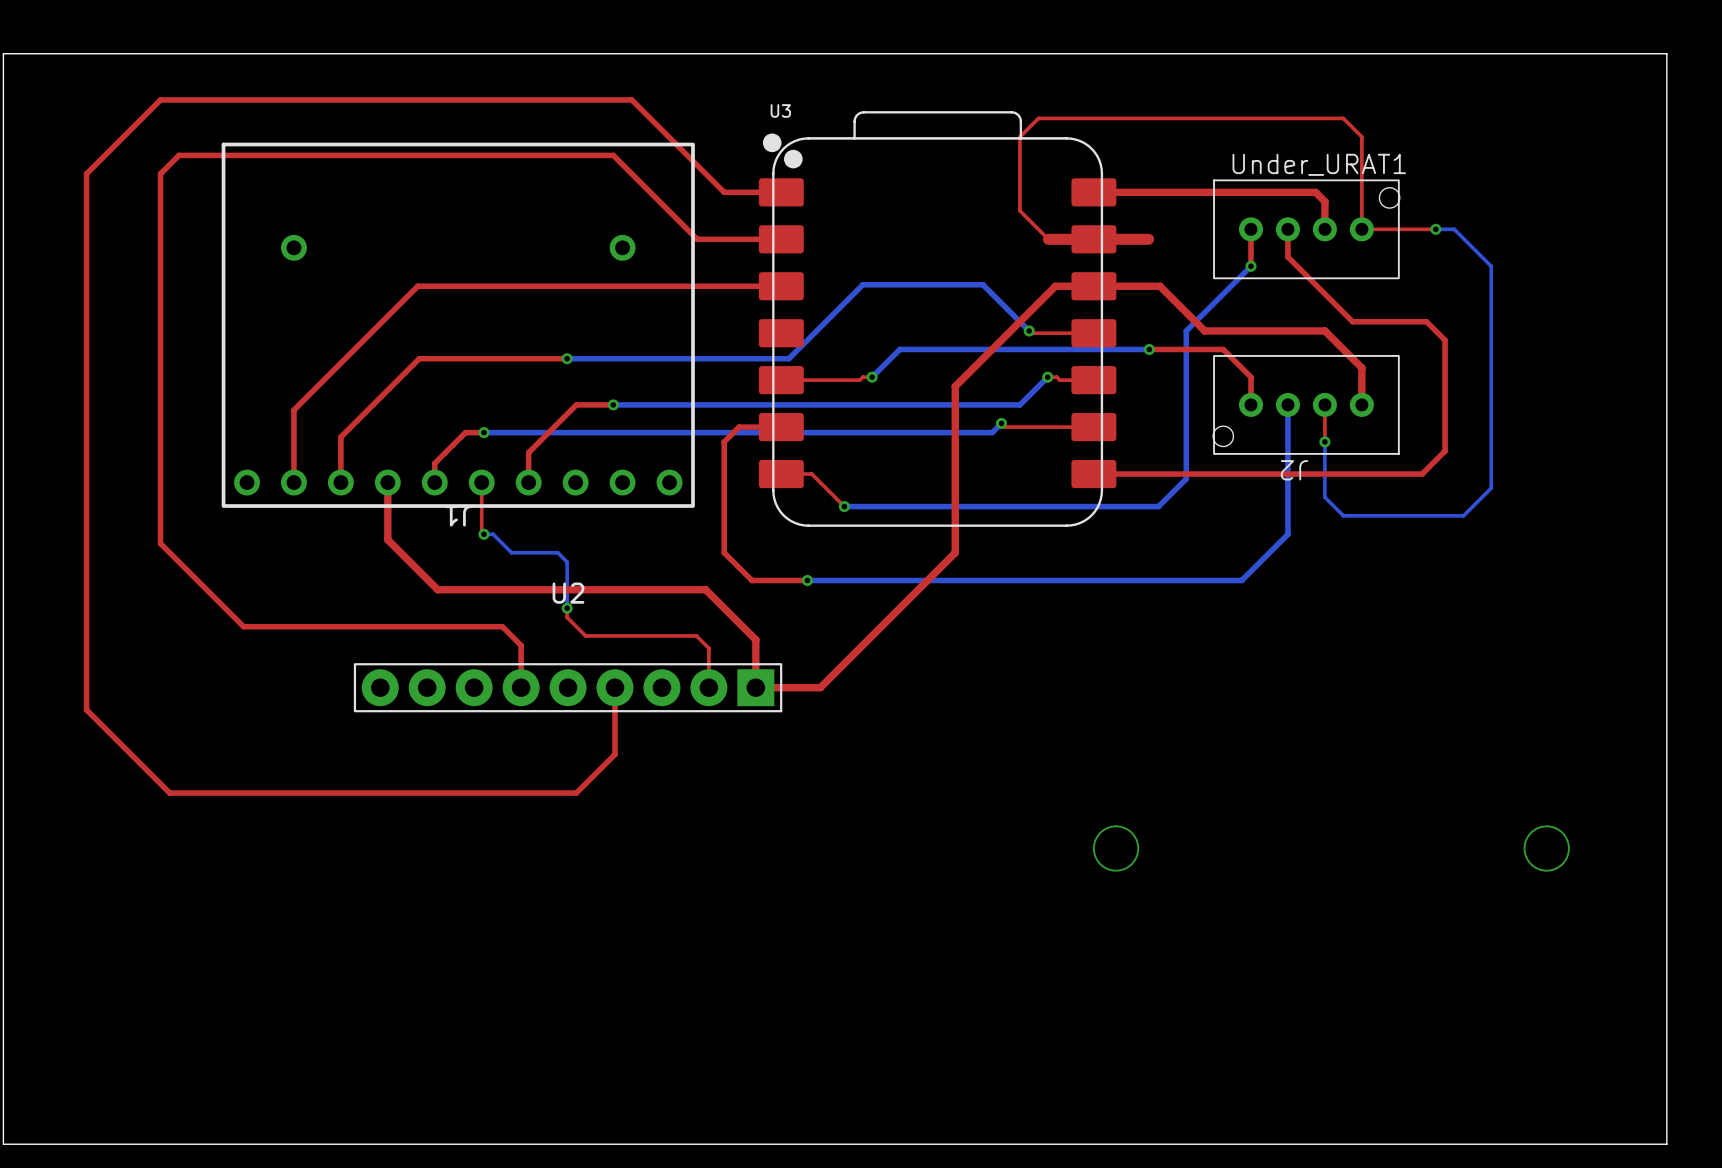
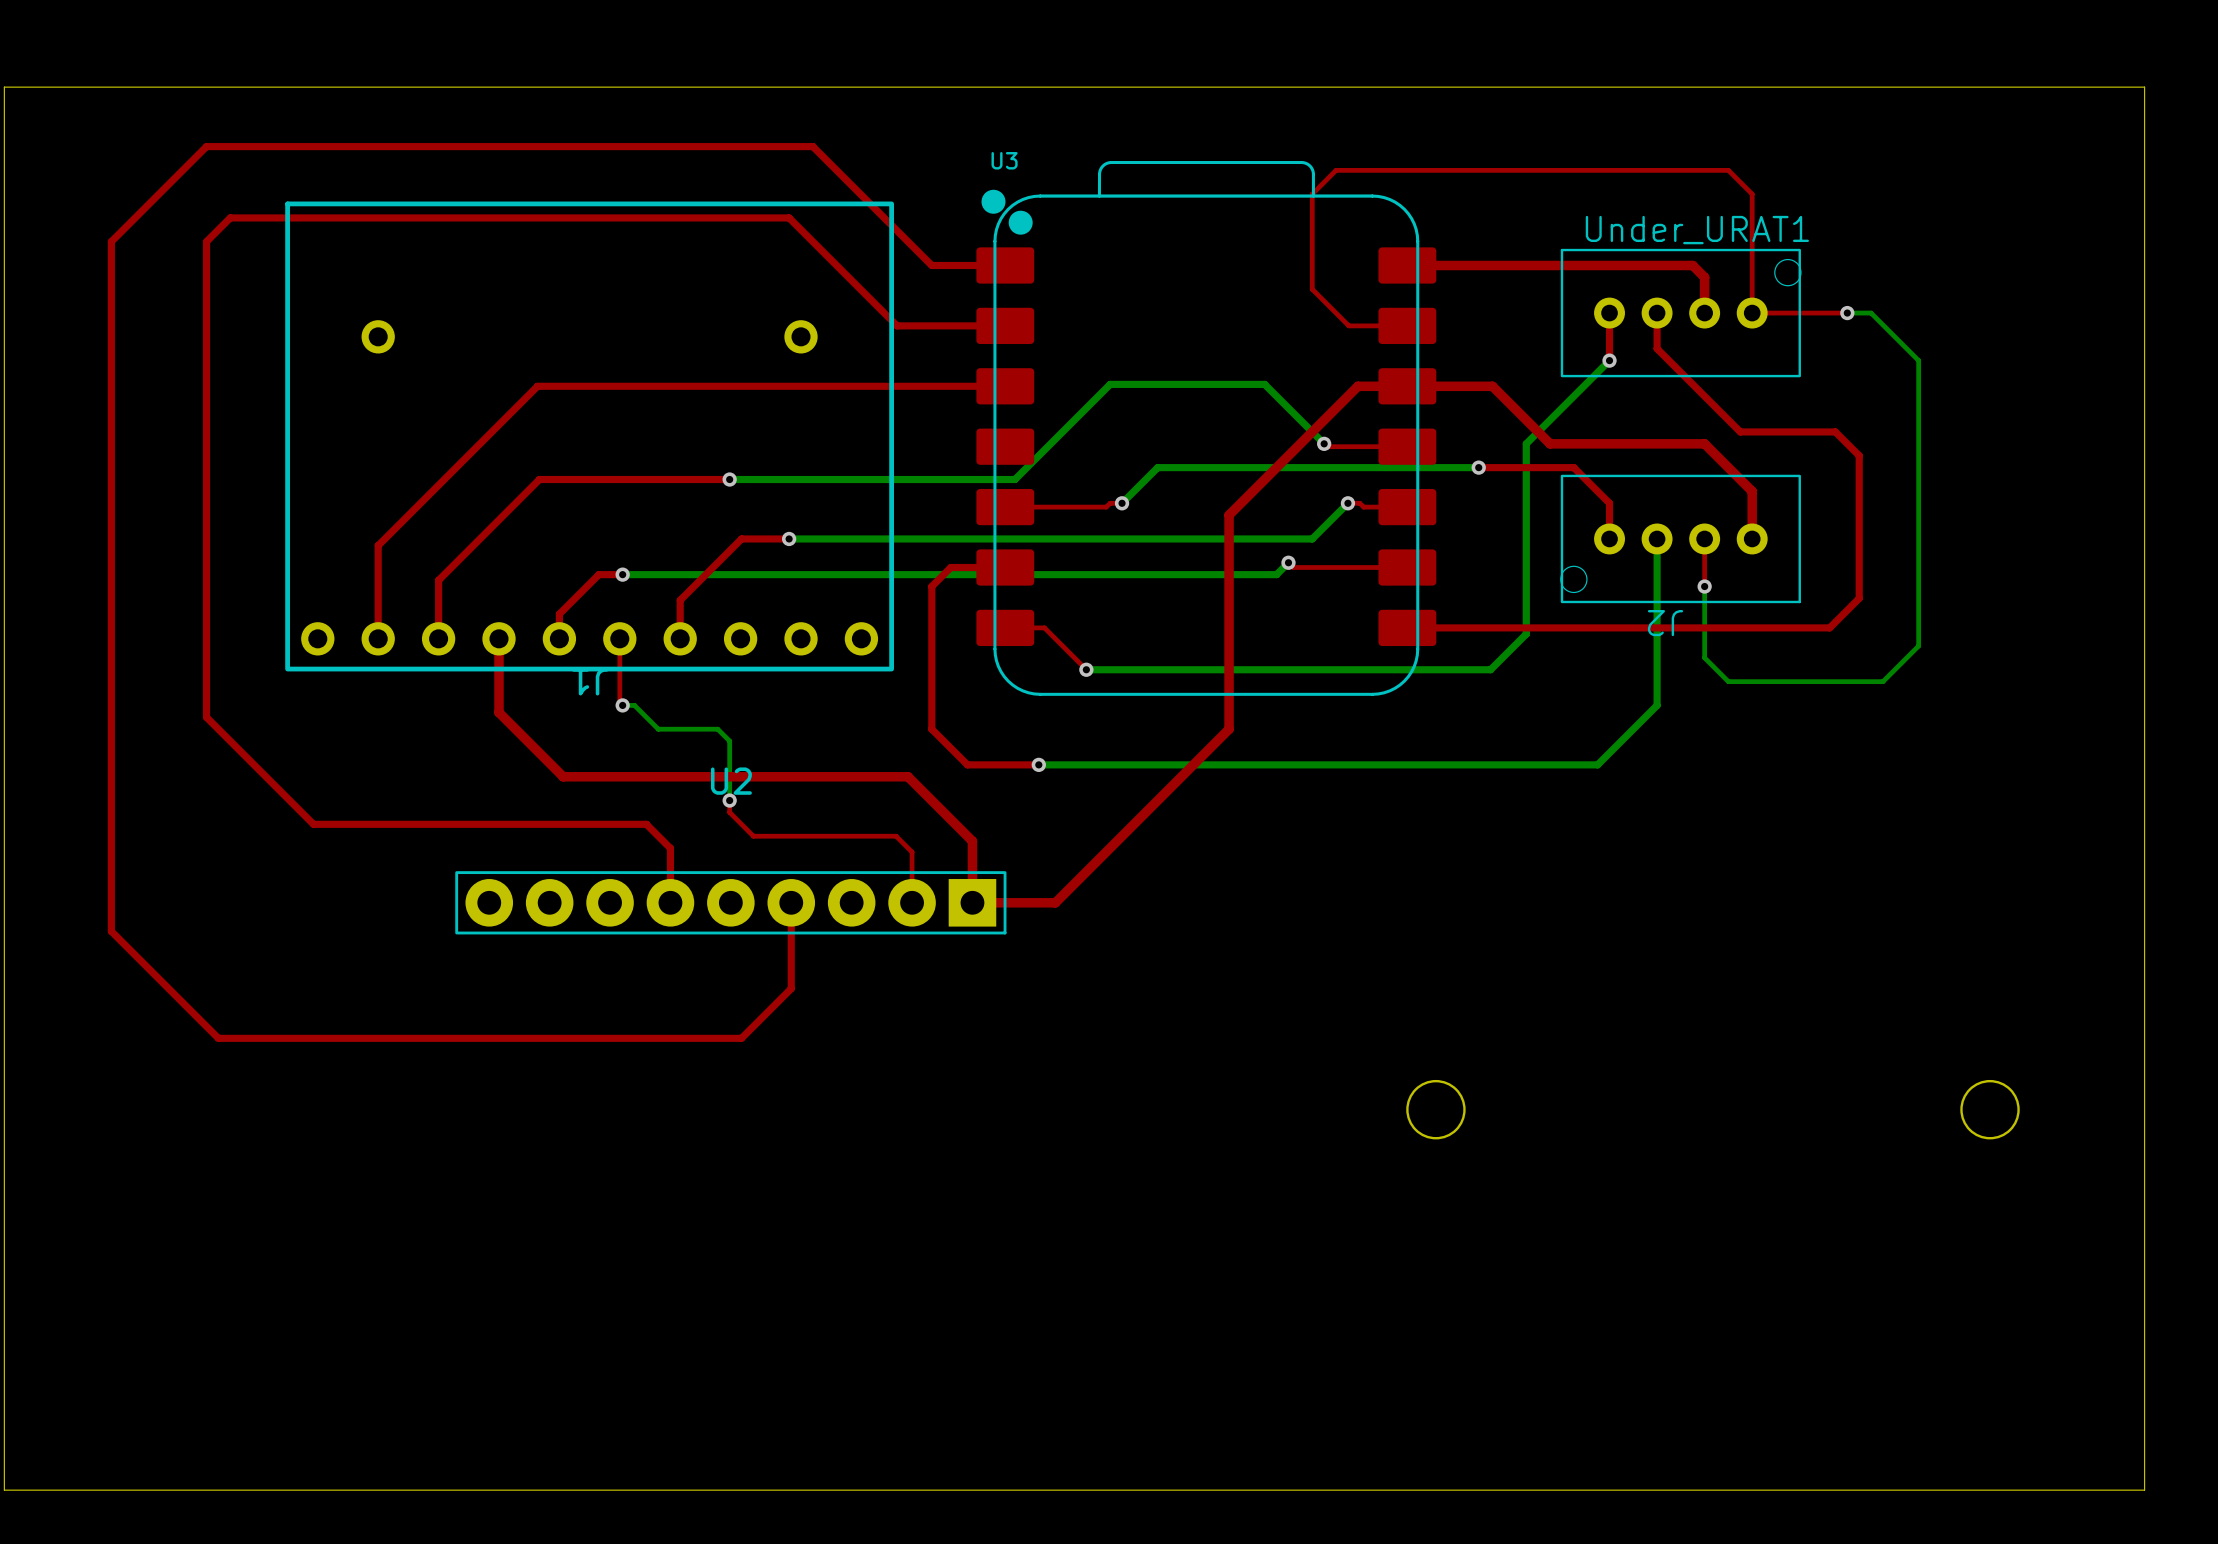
top track: (1149, 238) (1093, 239) -> none
top track width: thick (1048, 239) (1093, 239) -> thin (1348, 325) (1407, 325)

